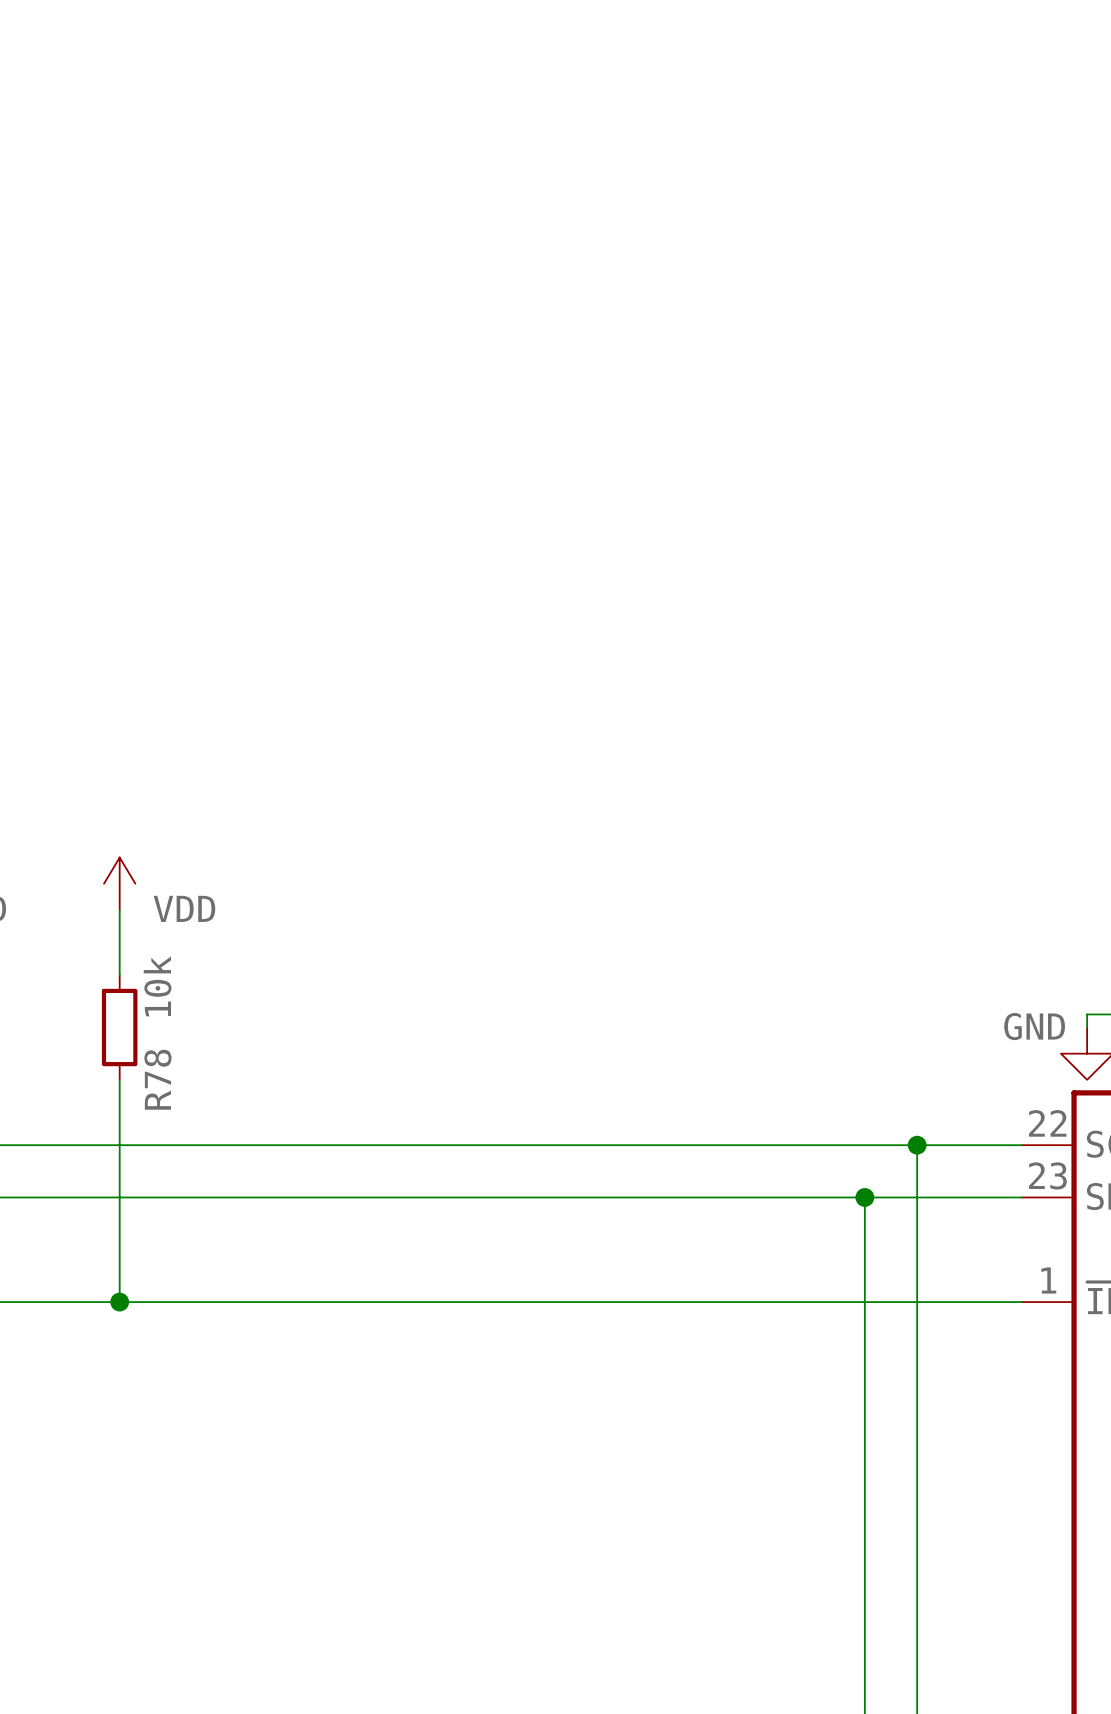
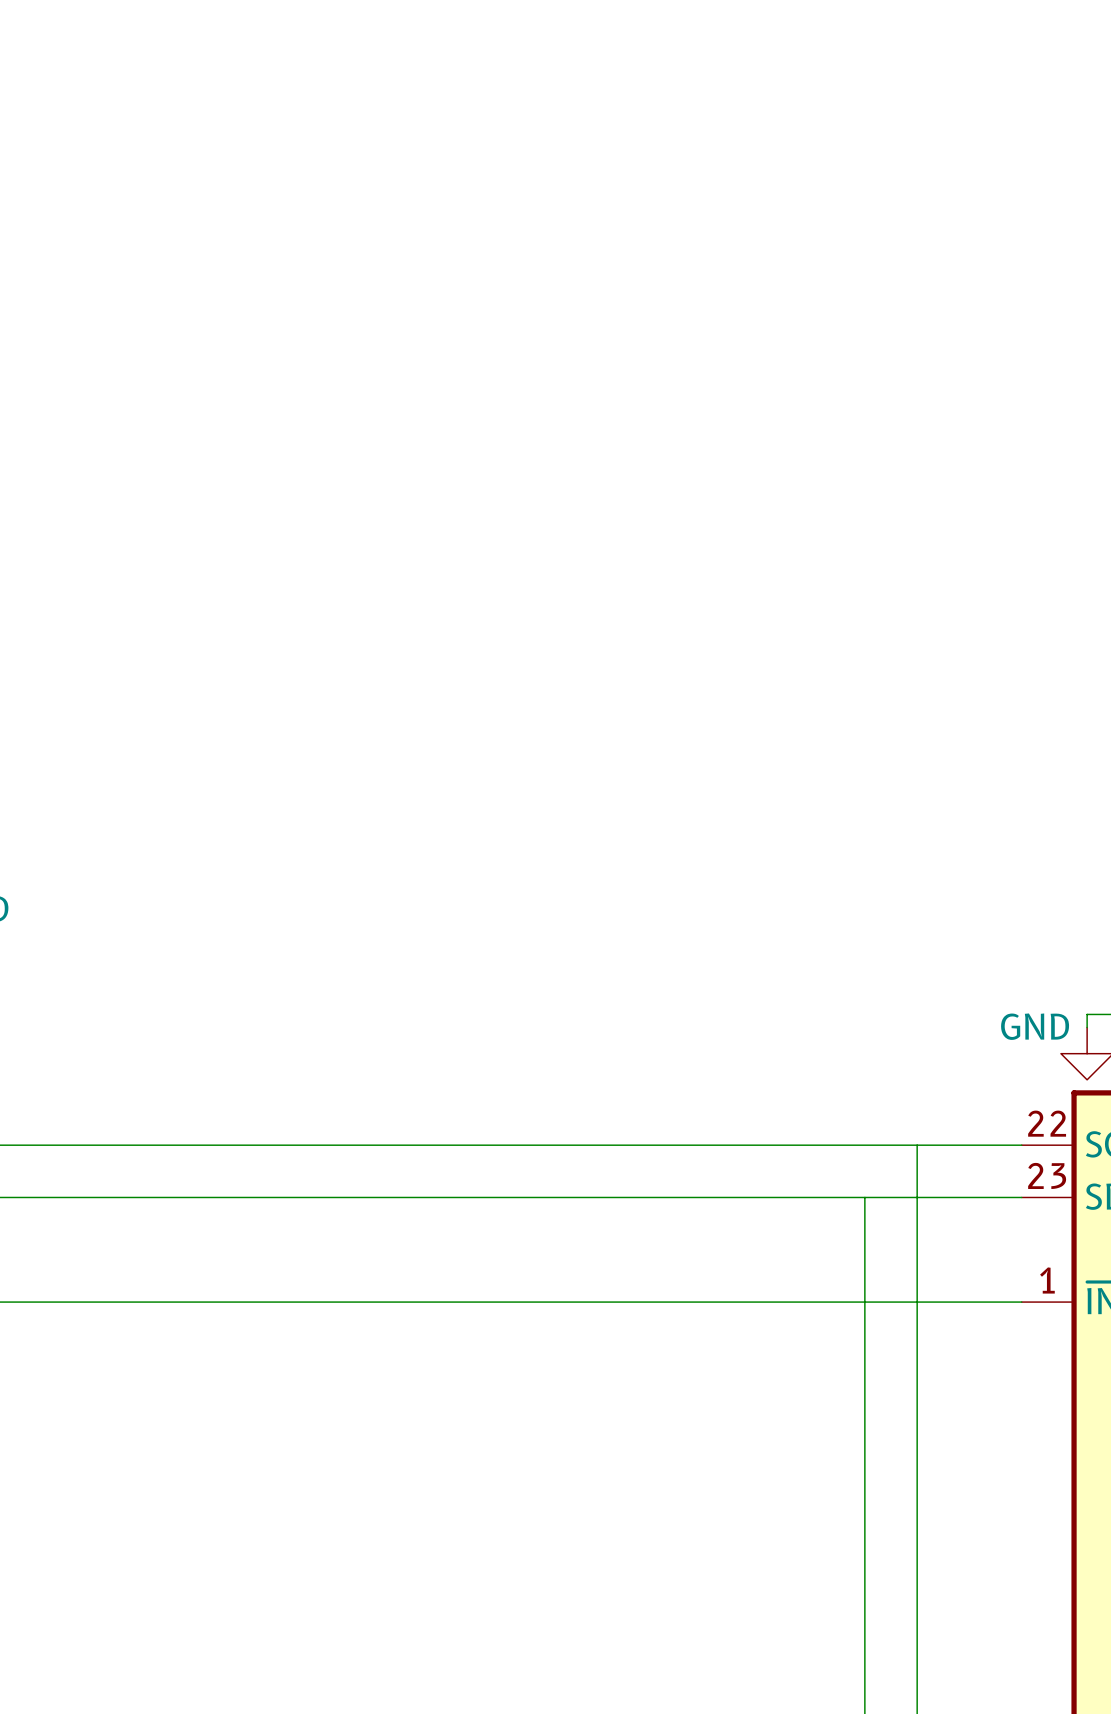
power symbol: VDD (119, 883) -> none
wire: (119, 909) (119, 975) -> none
R78: 10k (119, 1027) -> none
wire: (119, 1079) (119, 1302) -> none
junction: (917, 1145) -> none
junction: (864, 1197) -> none
junction: (119, 1302) -> none

